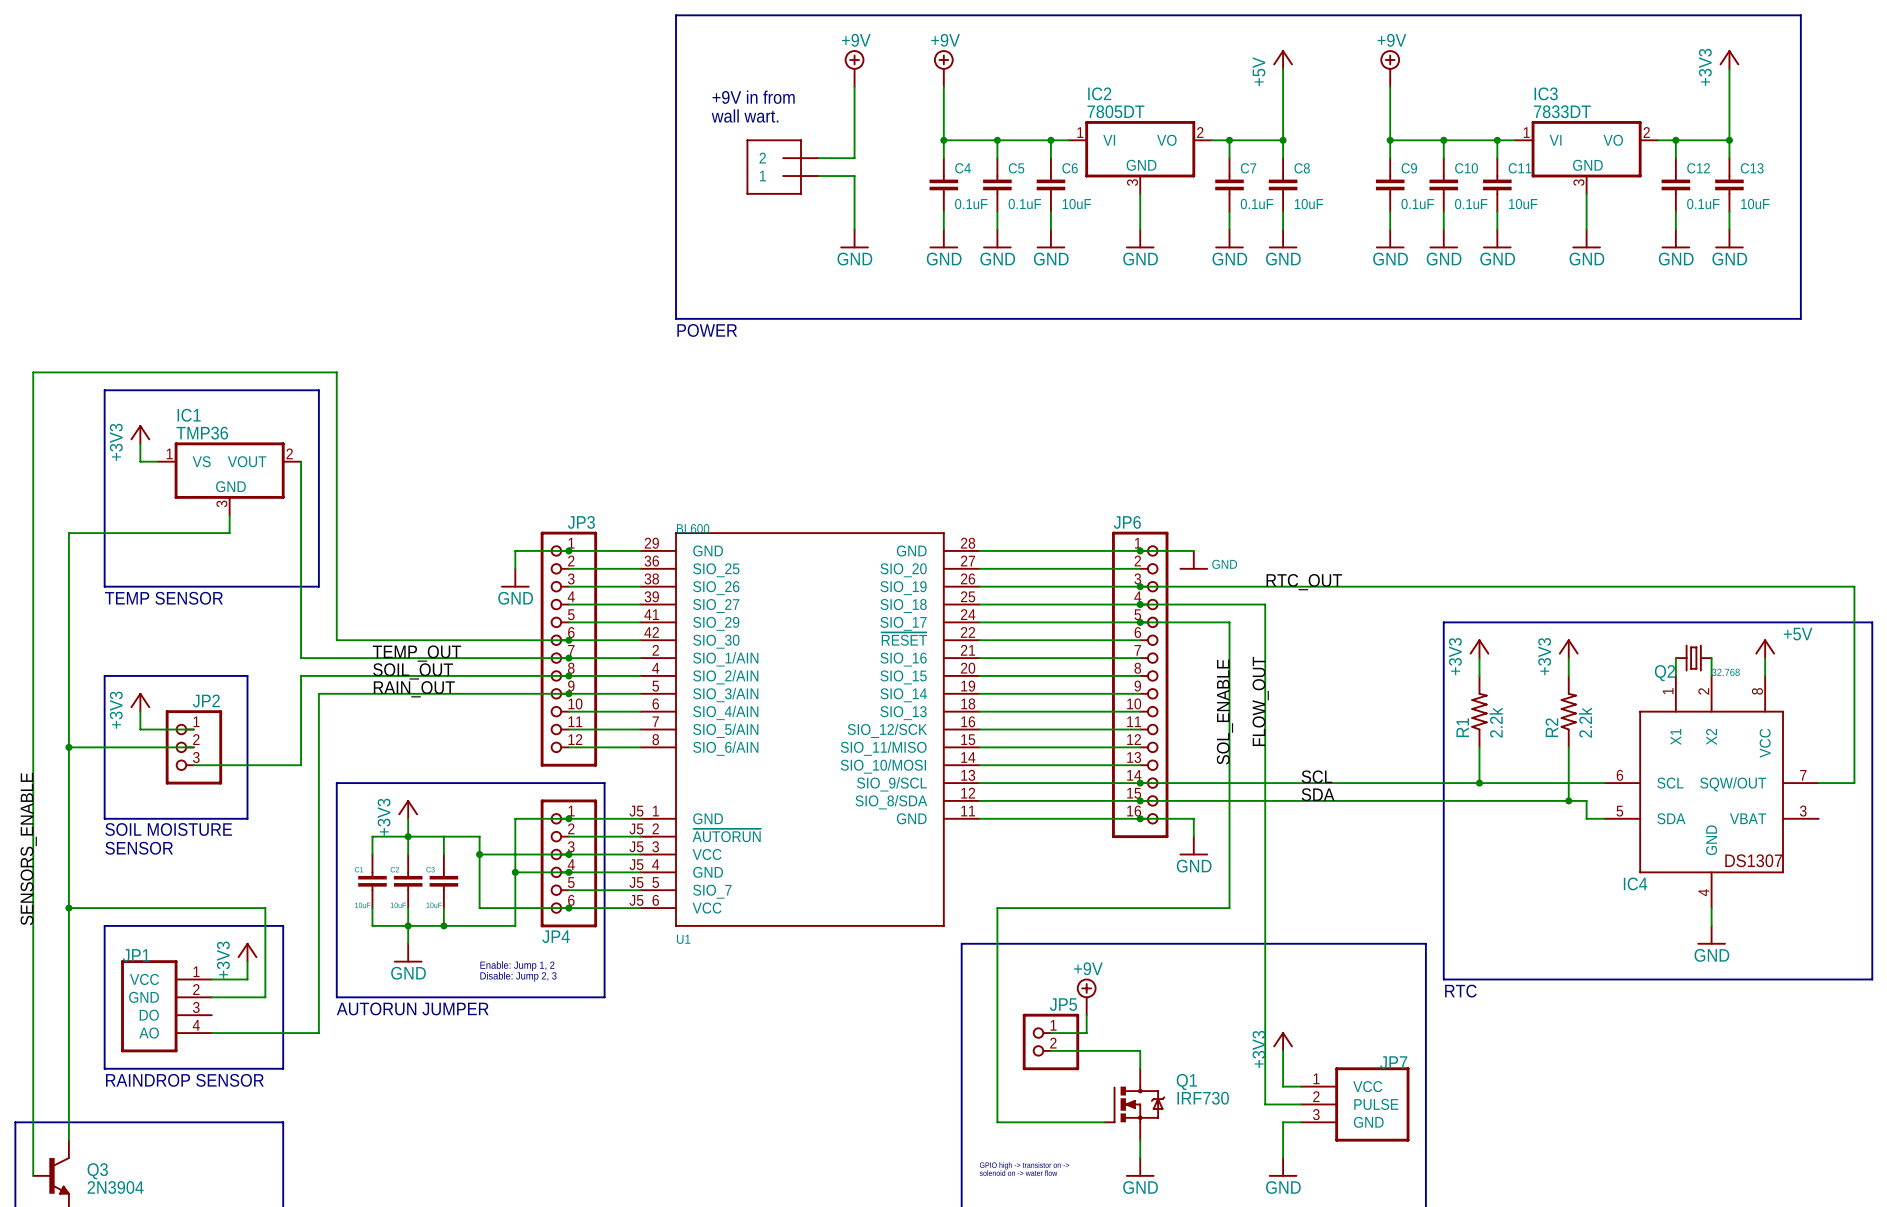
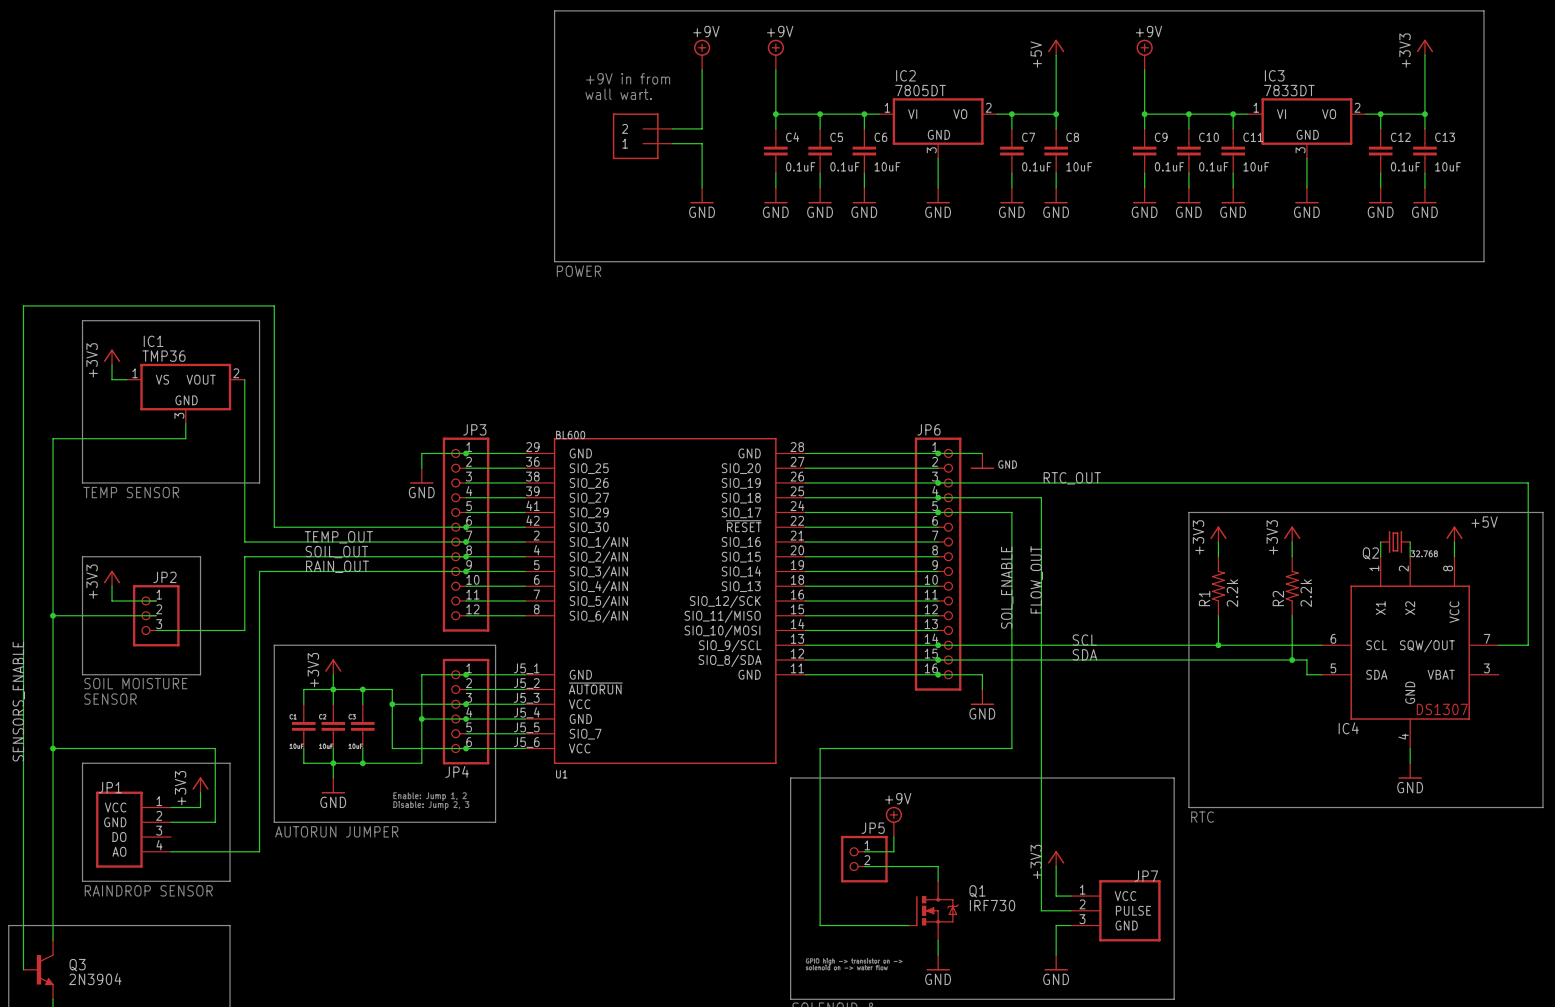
junction: none -> (362, 689)

